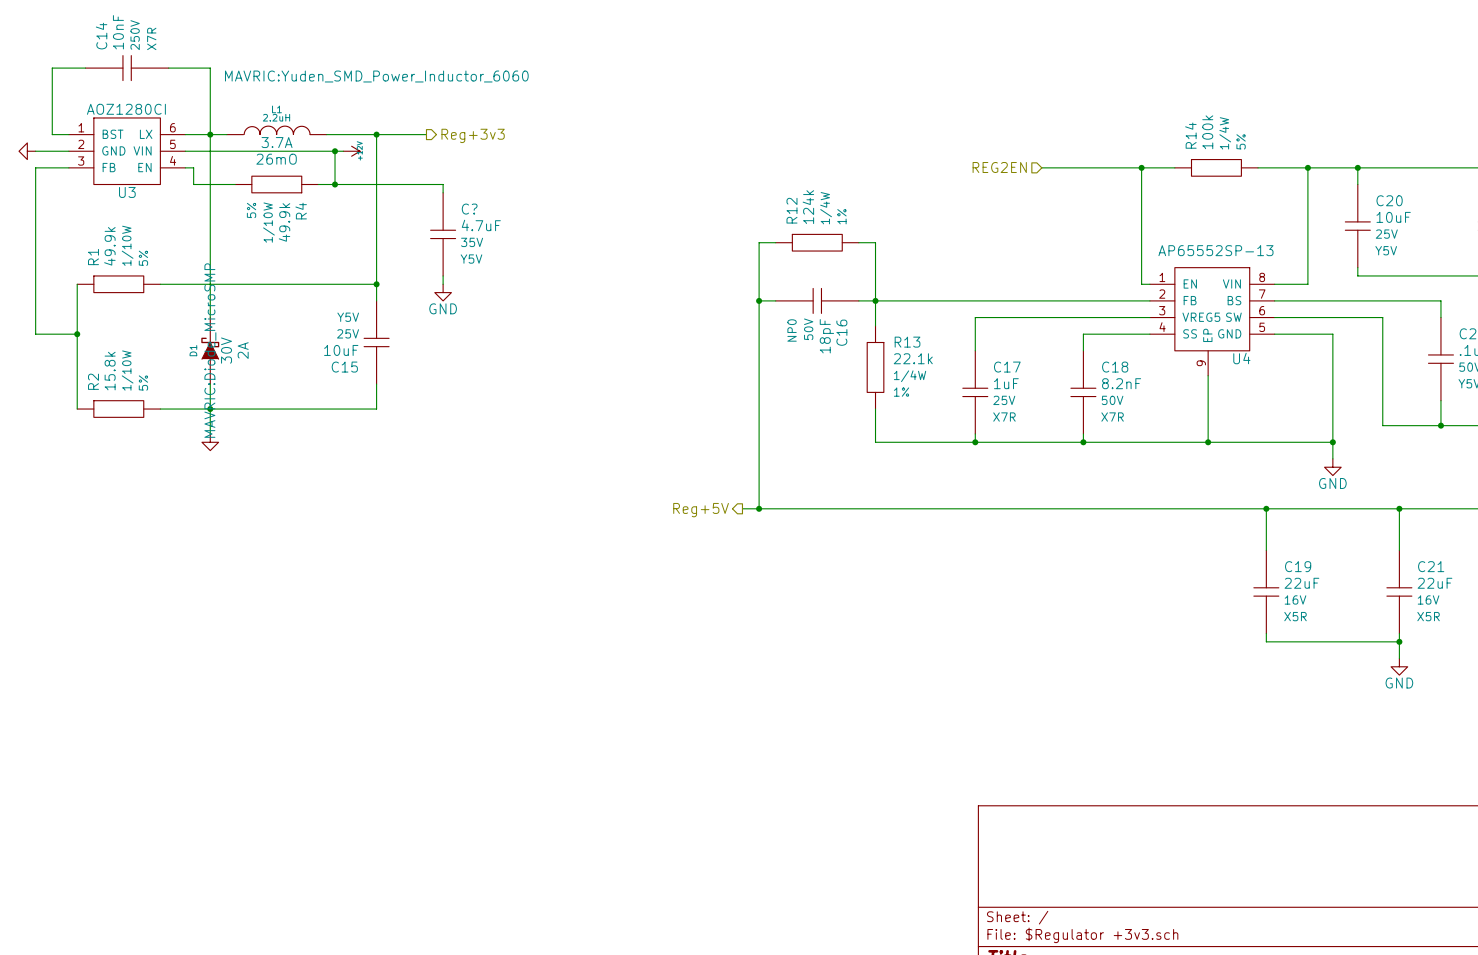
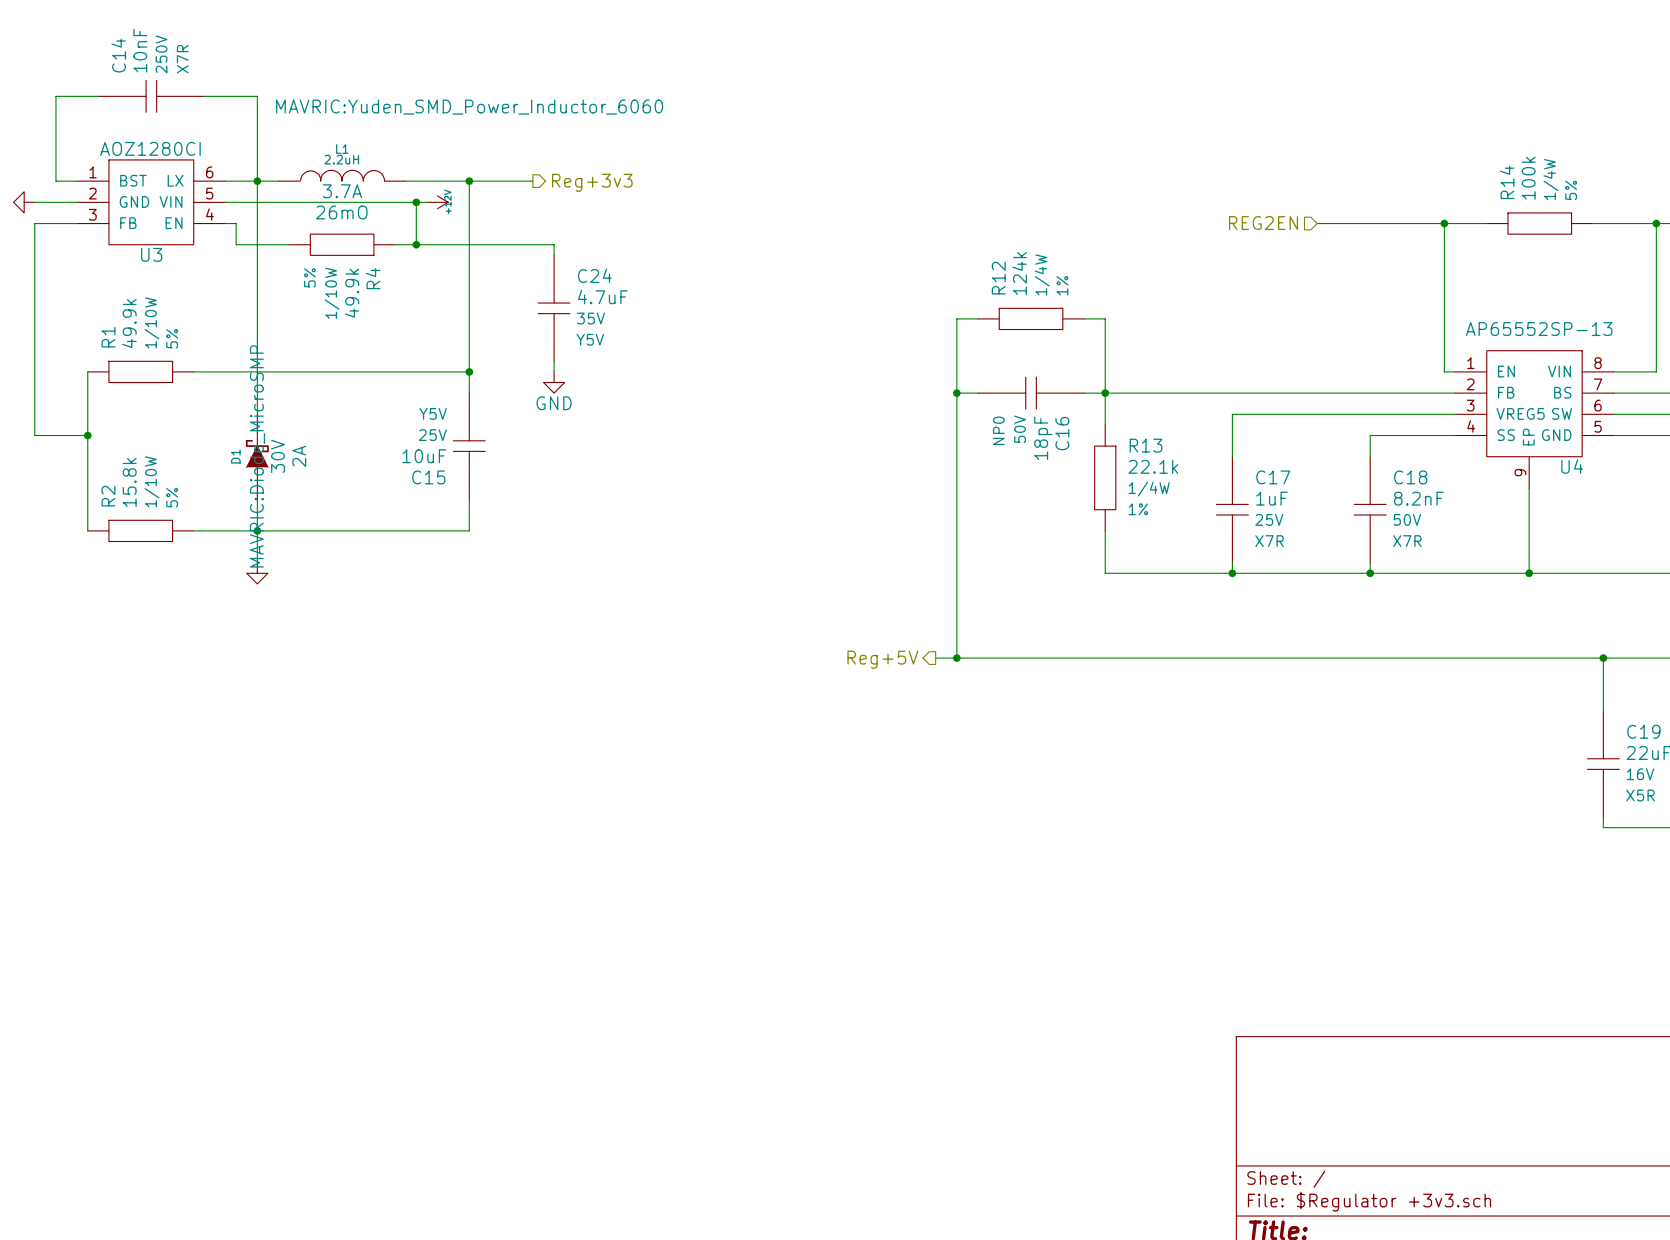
C? name: C? (469, 209) -> C24 (594, 275)

